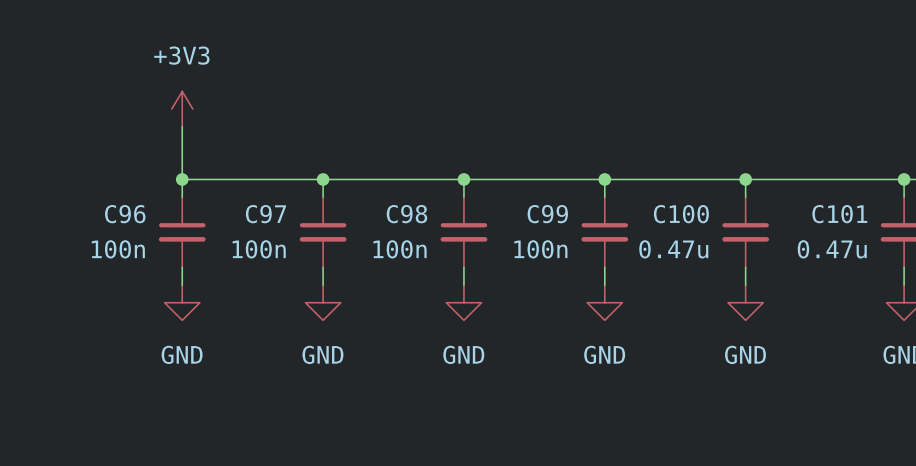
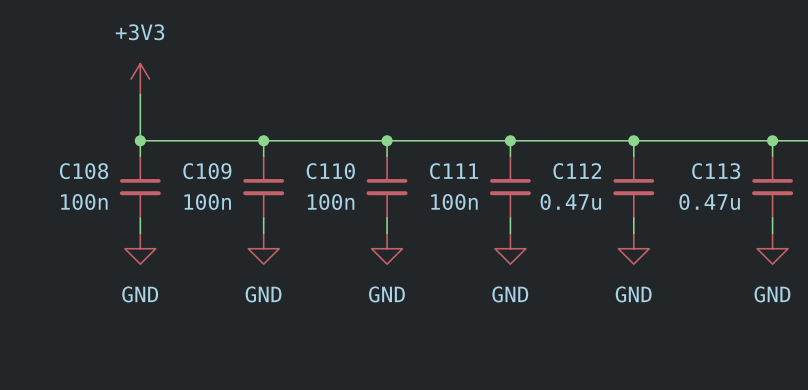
C96 name: C96 (125, 214) -> C108 (84, 171)
C97 name: C97 (265, 214) -> C109 (207, 171)
C98 name: C98 (406, 214) -> C110 (330, 171)
C99 name: C99 (547, 214) -> C111 (454, 171)
C100 name: C100 (681, 214) -> C112 (577, 171)
C101 name: C101 (839, 214) -> C113 (716, 171)

